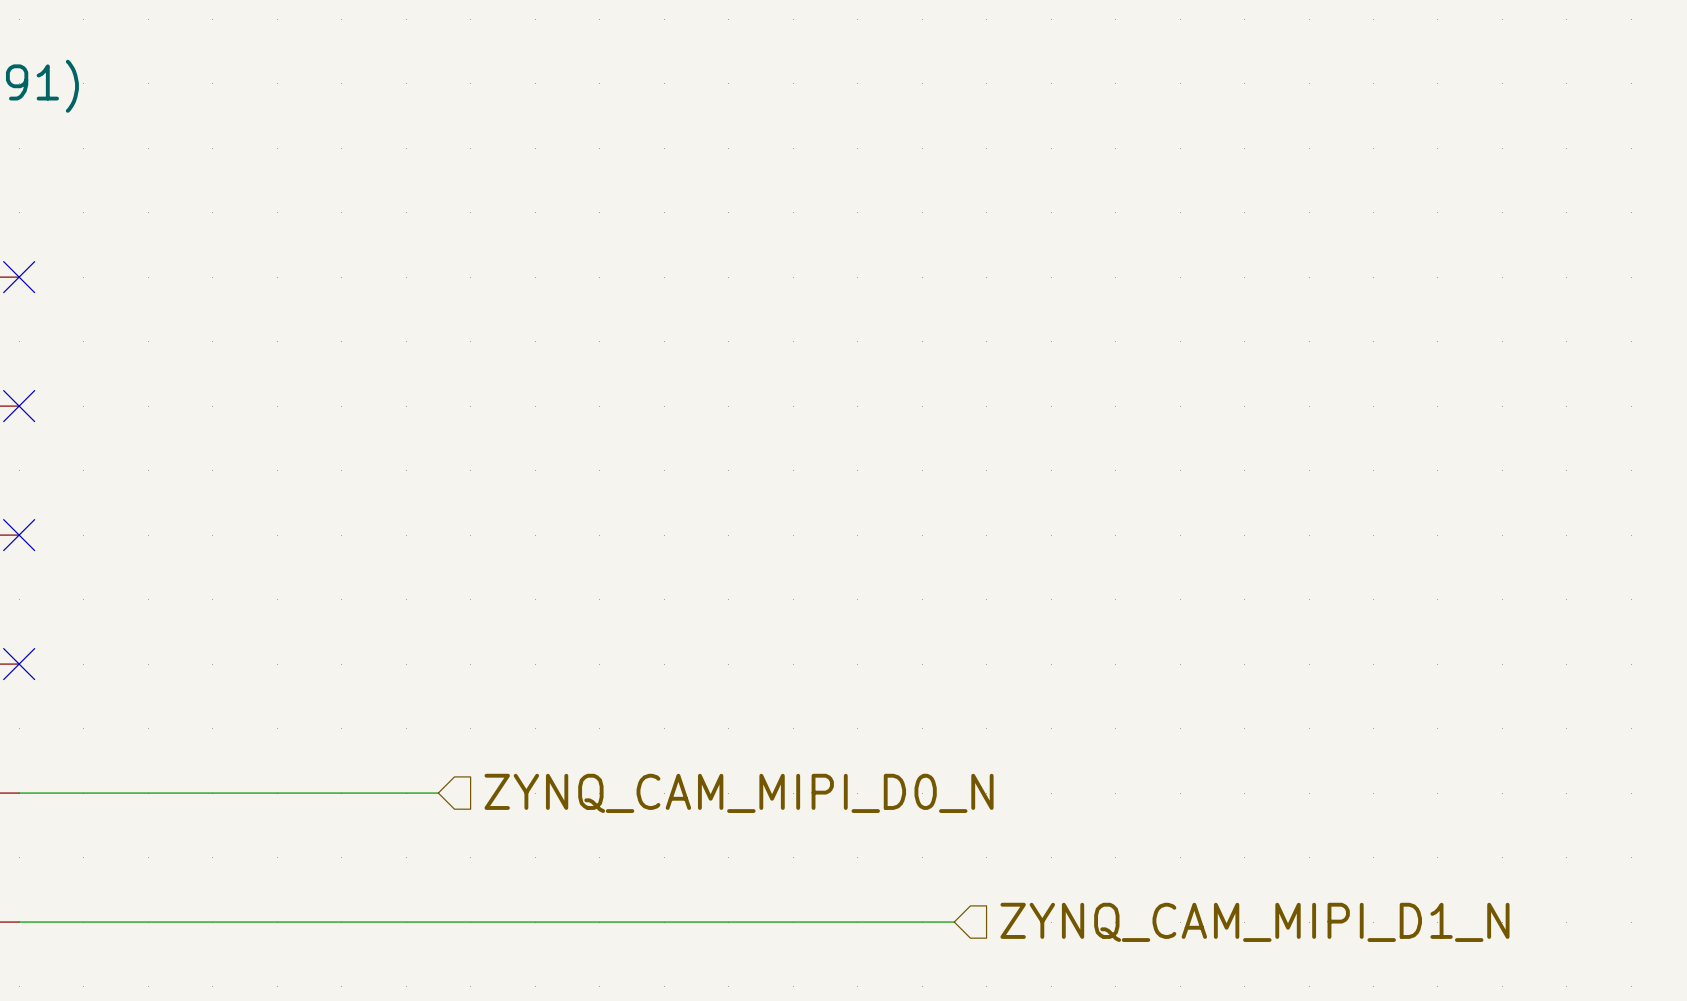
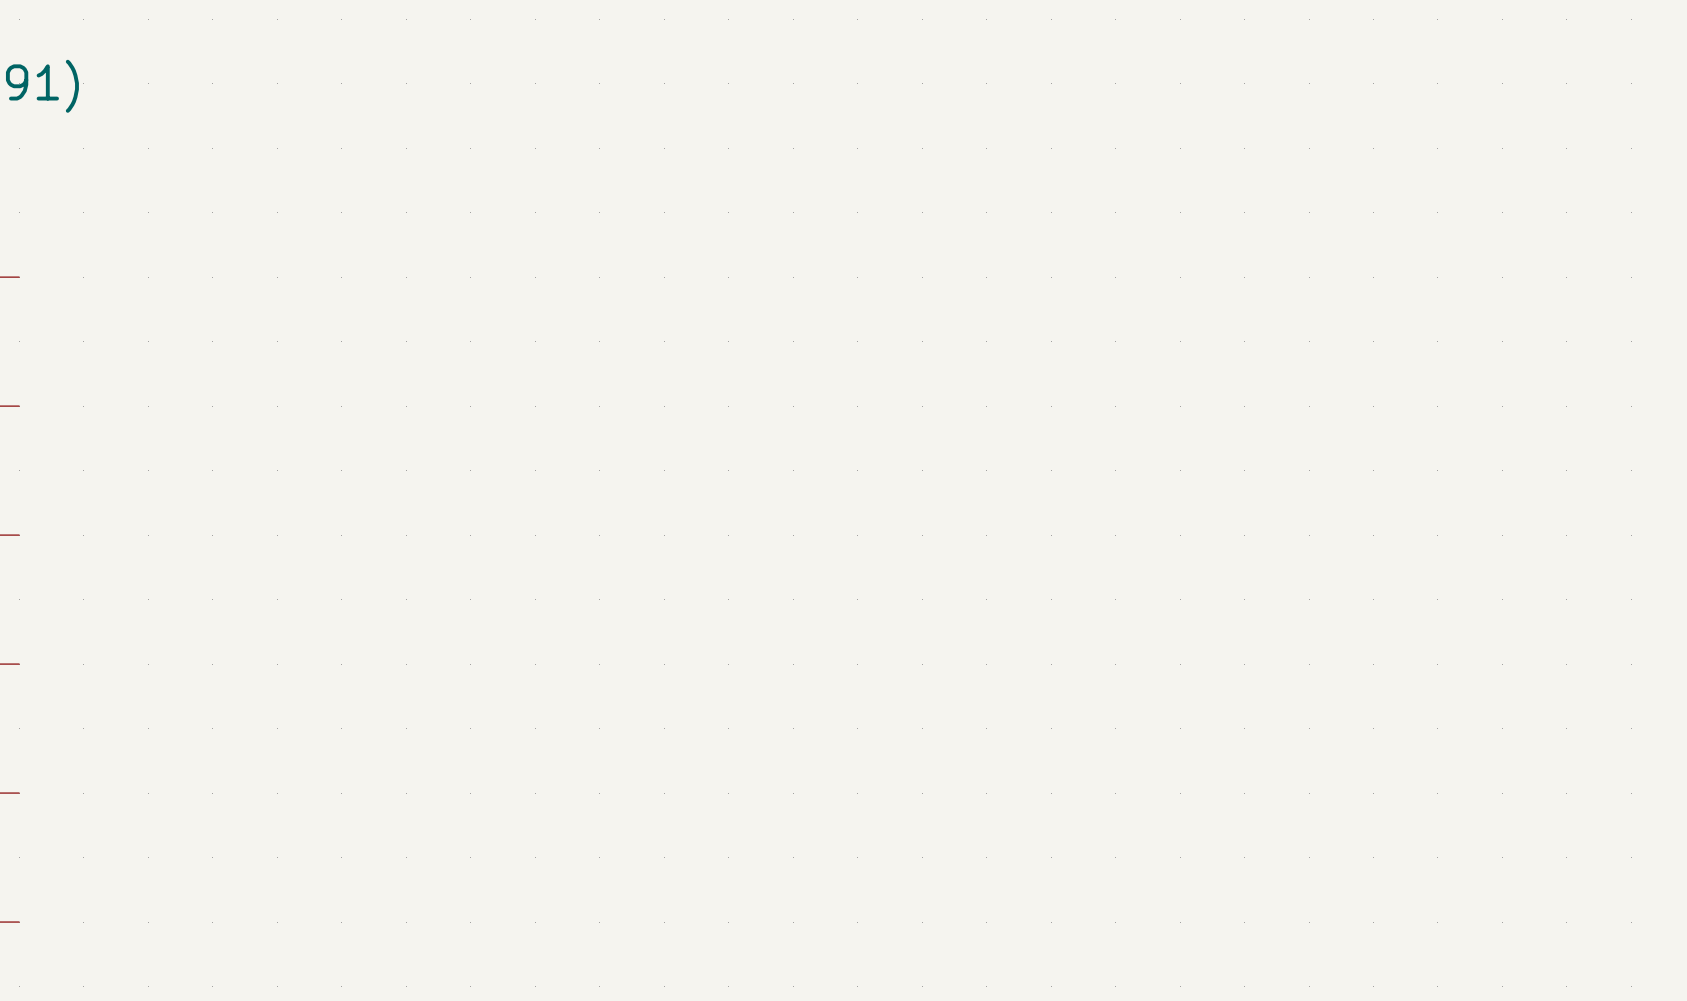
no-connect mark: (19, 277) -> none
no-connect mark: (19, 406) -> none
no-connect mark: (19, 535) -> none
no-connect mark: (19, 664) -> none
wire: (19, 793) (438, 793) -> none
hierarchical label: ZYNQ_CAM_MIPI_D0_N (739, 793) -> none
wire: (19, 922) (954, 922) -> none
hierarchical label: ZYNQ_CAM_MIPI_D1_N (1255, 922) -> none

